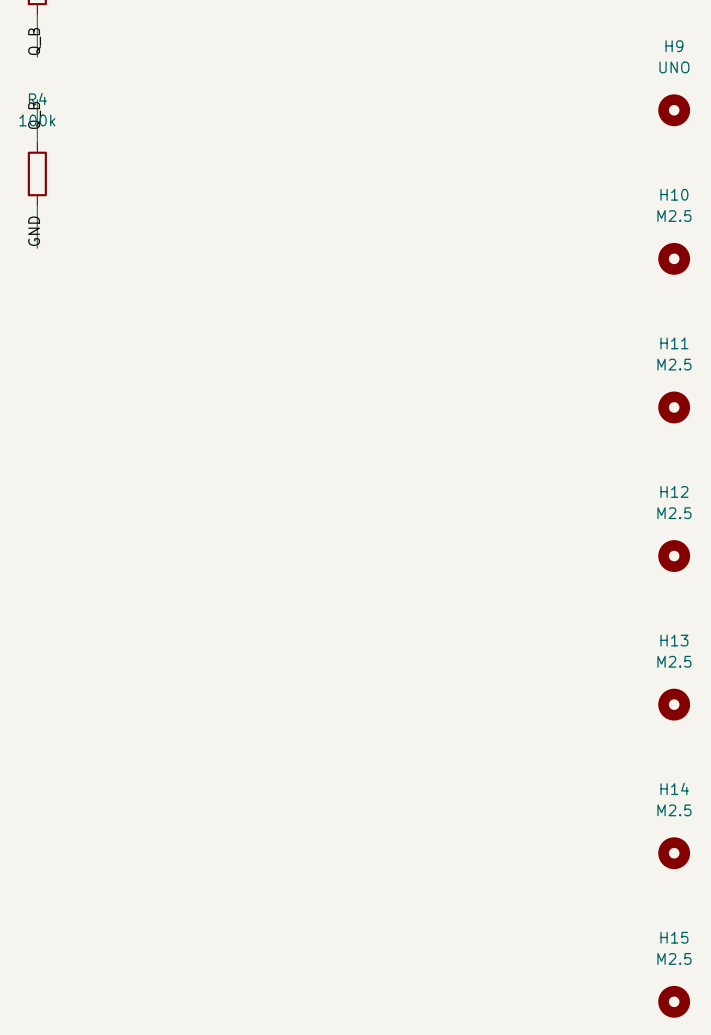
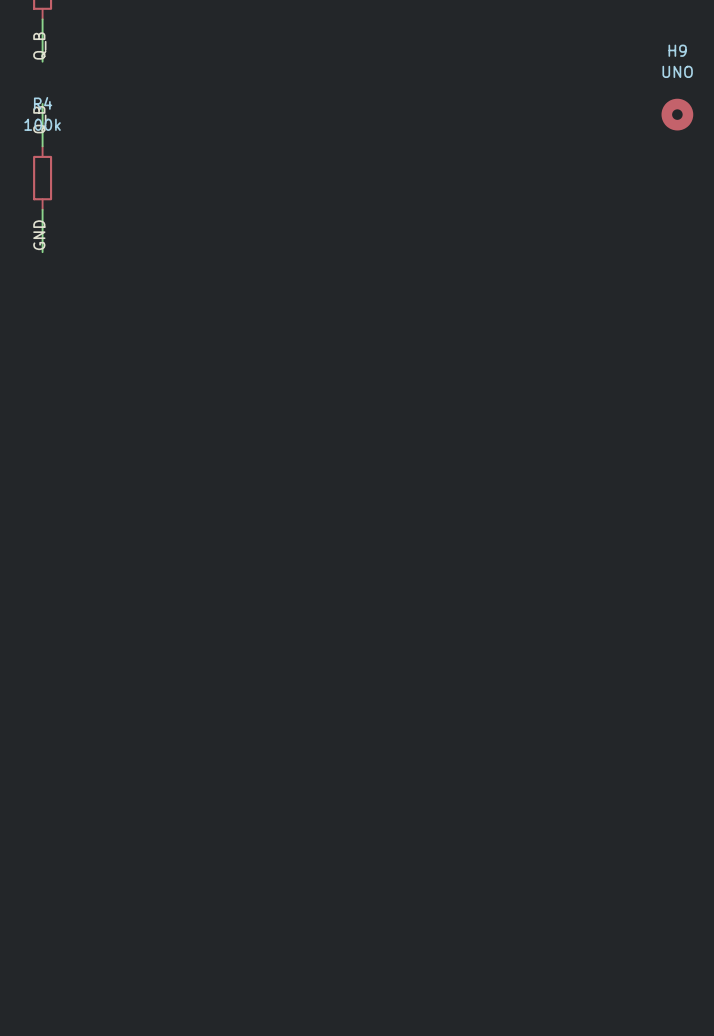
H10: M2.5 (674, 258) -> none
H11: M2.5 (674, 407) -> none
H12: M2.5 (674, 556) -> none
H13: M2.5 (674, 704) -> none
H14: M2.5 (674, 853) -> none
H15: M2.5 (674, 1001) -> none

